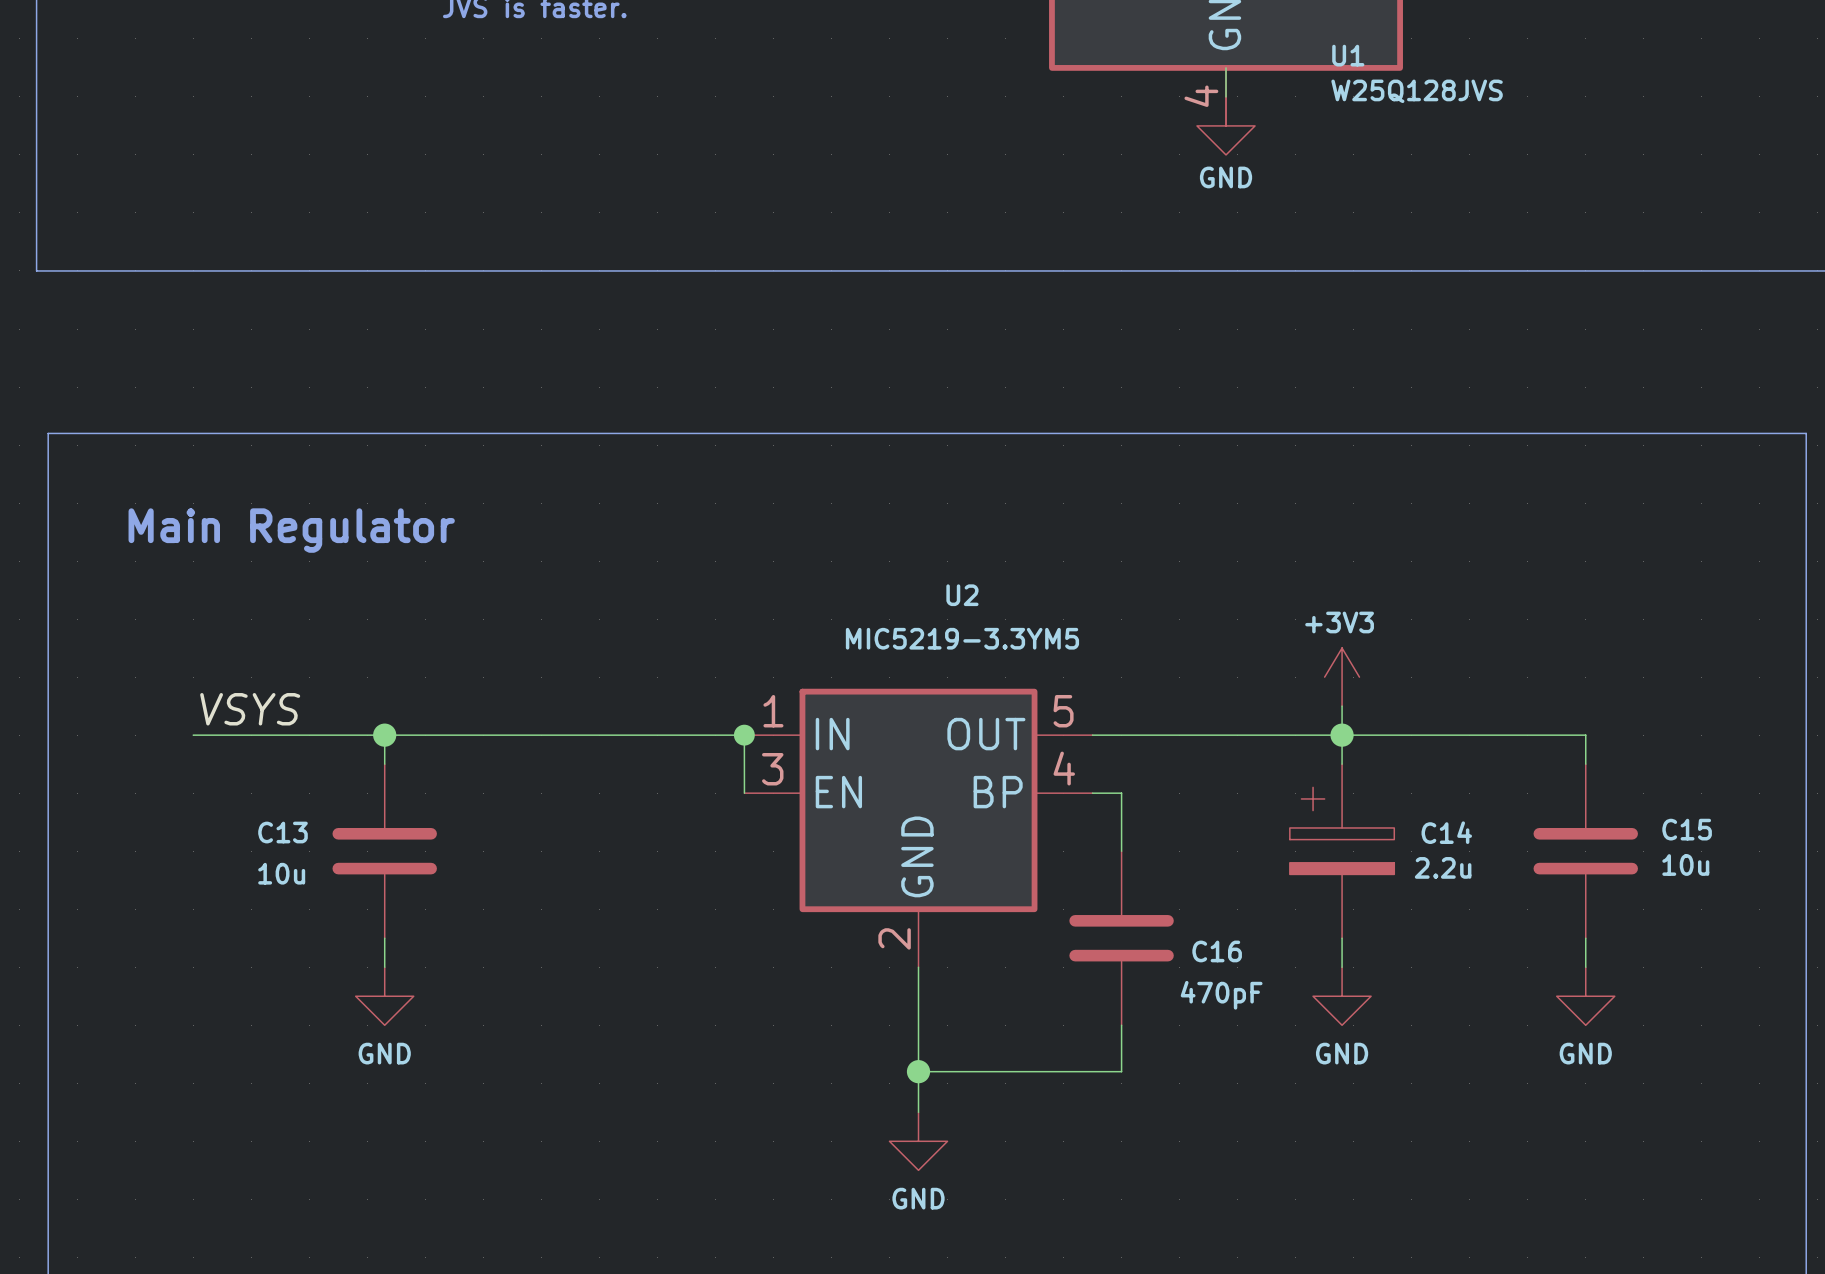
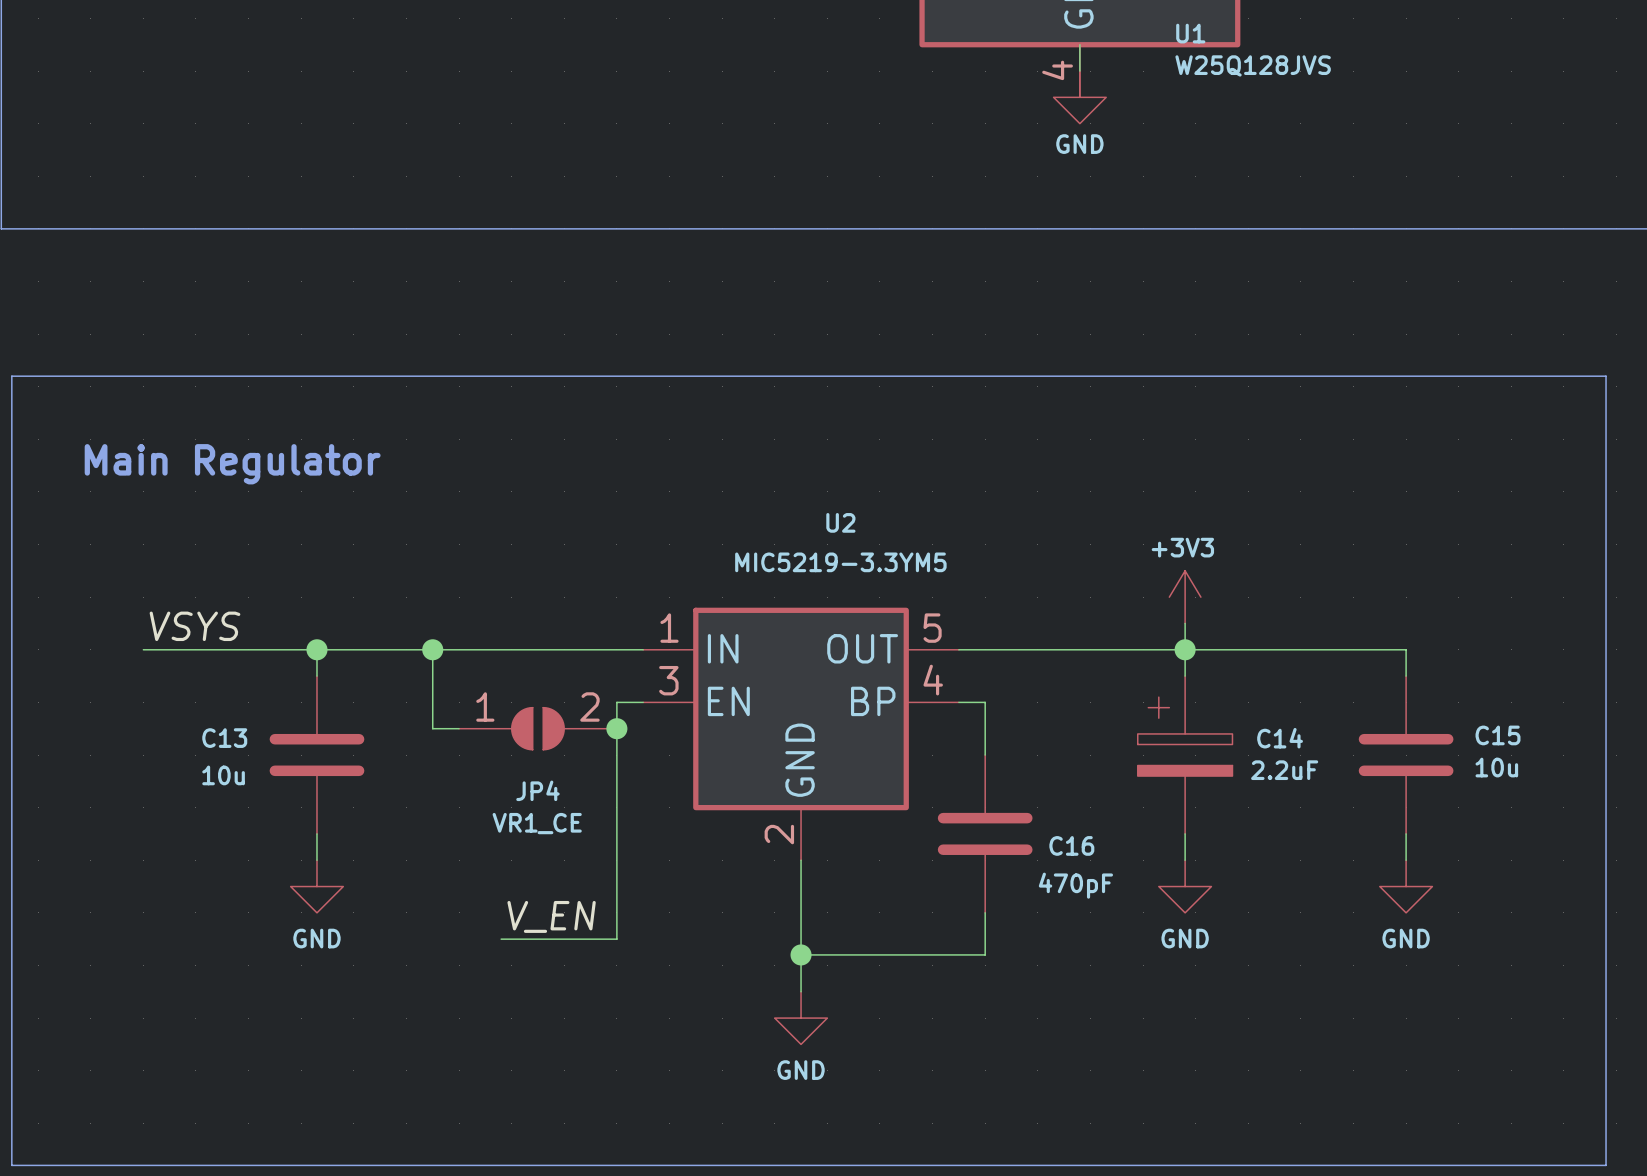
wire: none -> (432, 649) (432, 728) (459, 728)
junction: none -> (432, 649)
wire: (744, 735) (744, 793) -> (501, 939) (616, 939) (616, 702) (643, 702)
junction: (744, 735) -> none
JP4: none -> VR1_CE (537, 728)
junction: none -> (616, 728)
C14 value: 2.2u (1443, 867) -> 2.2uF (1284, 770)
label: none -> V_EN (551, 916)

